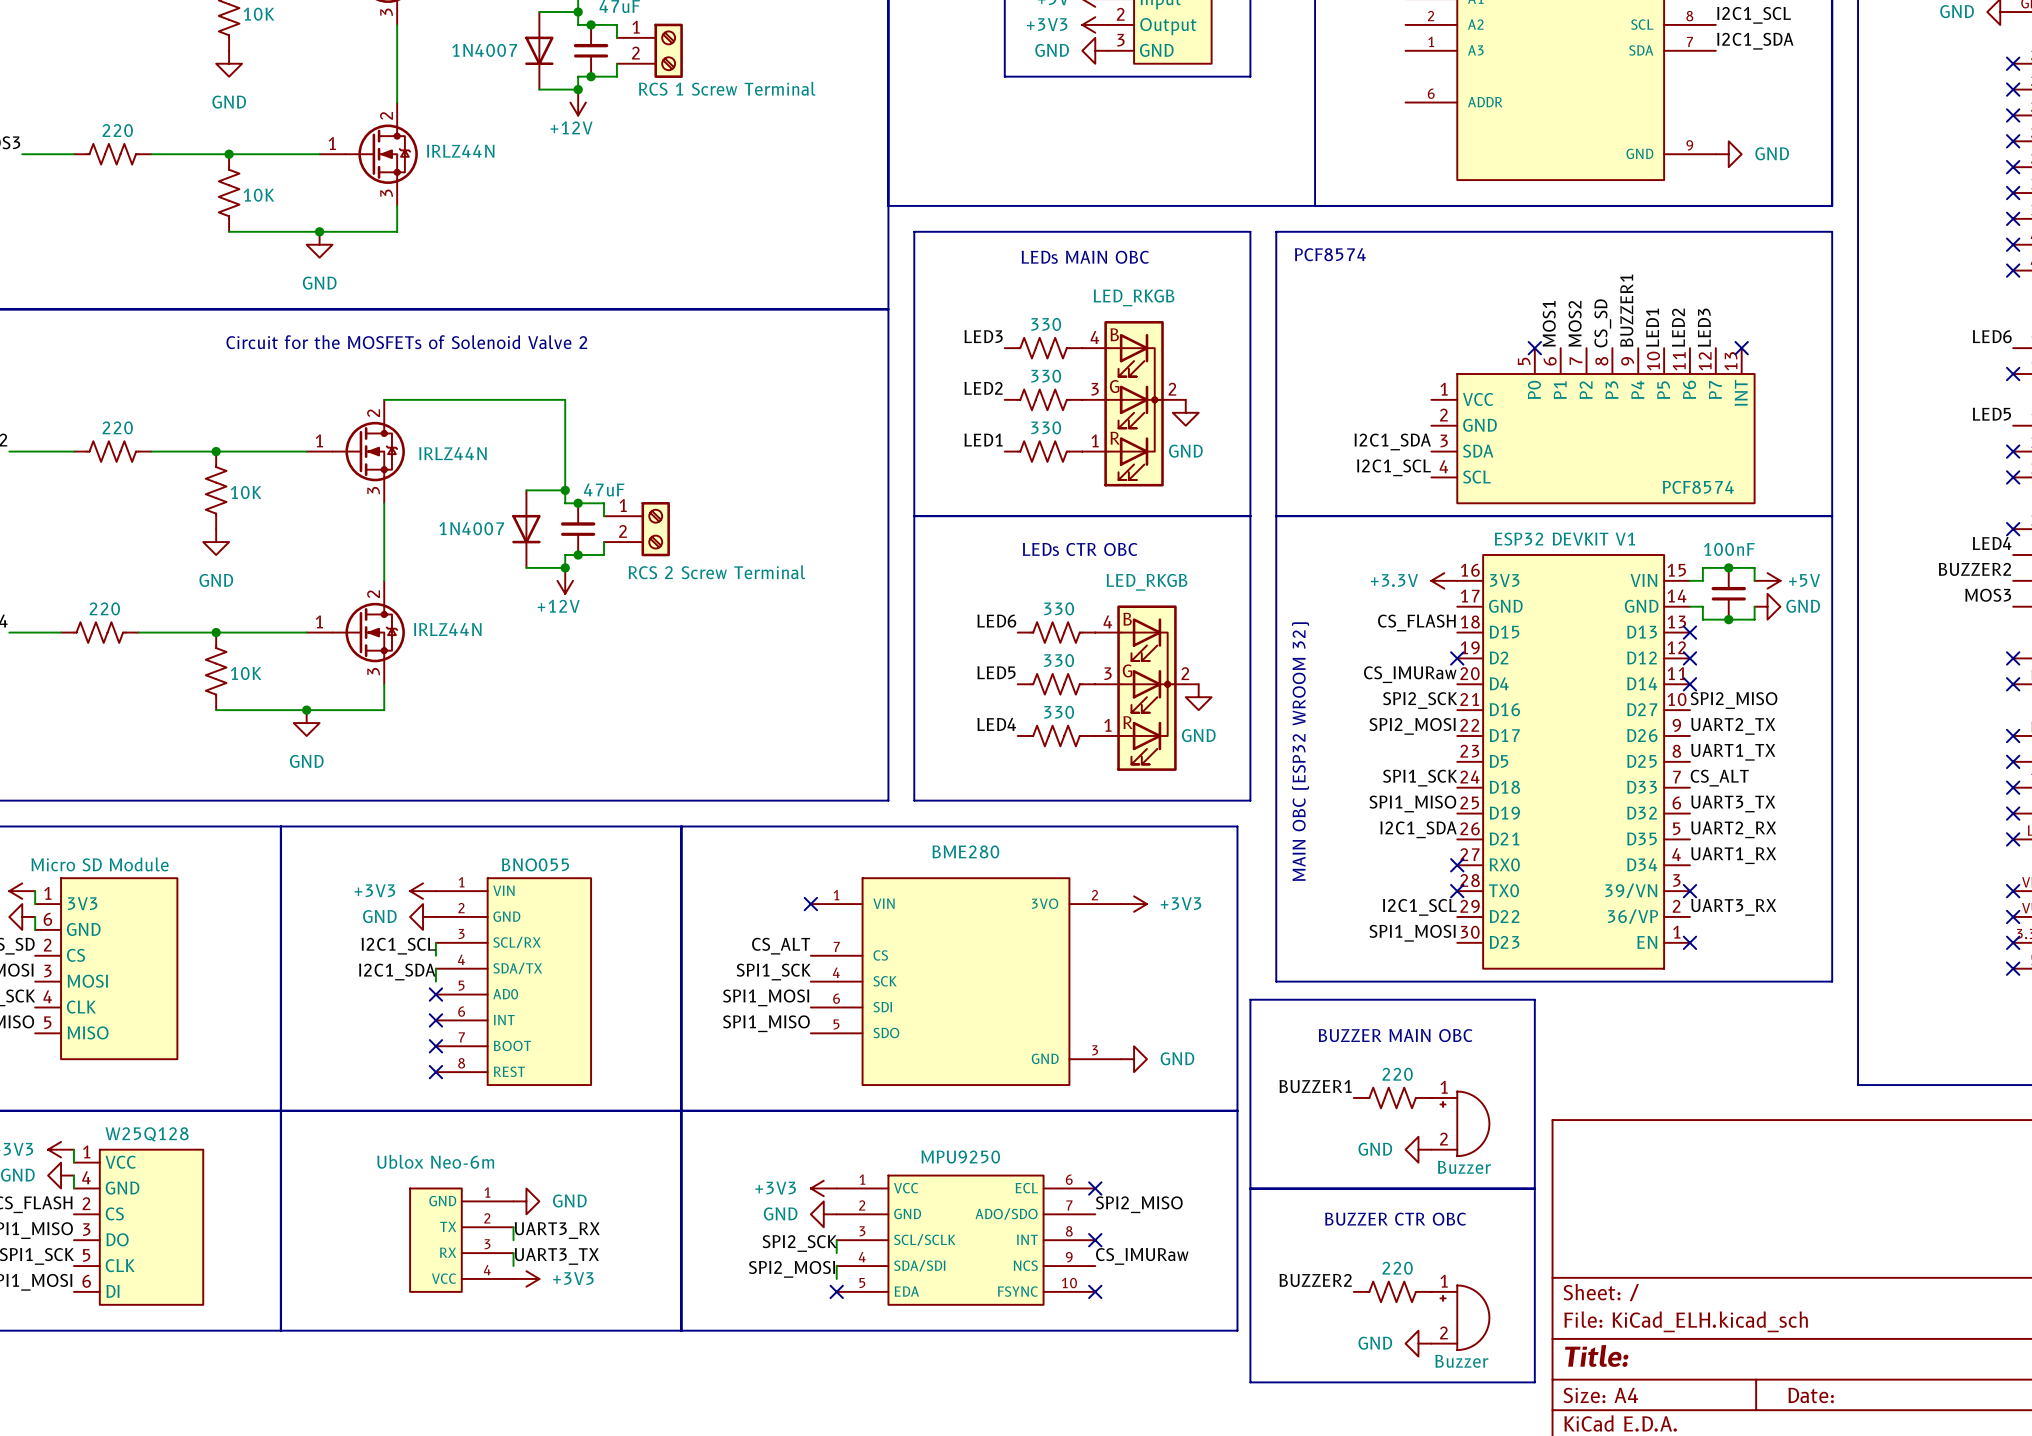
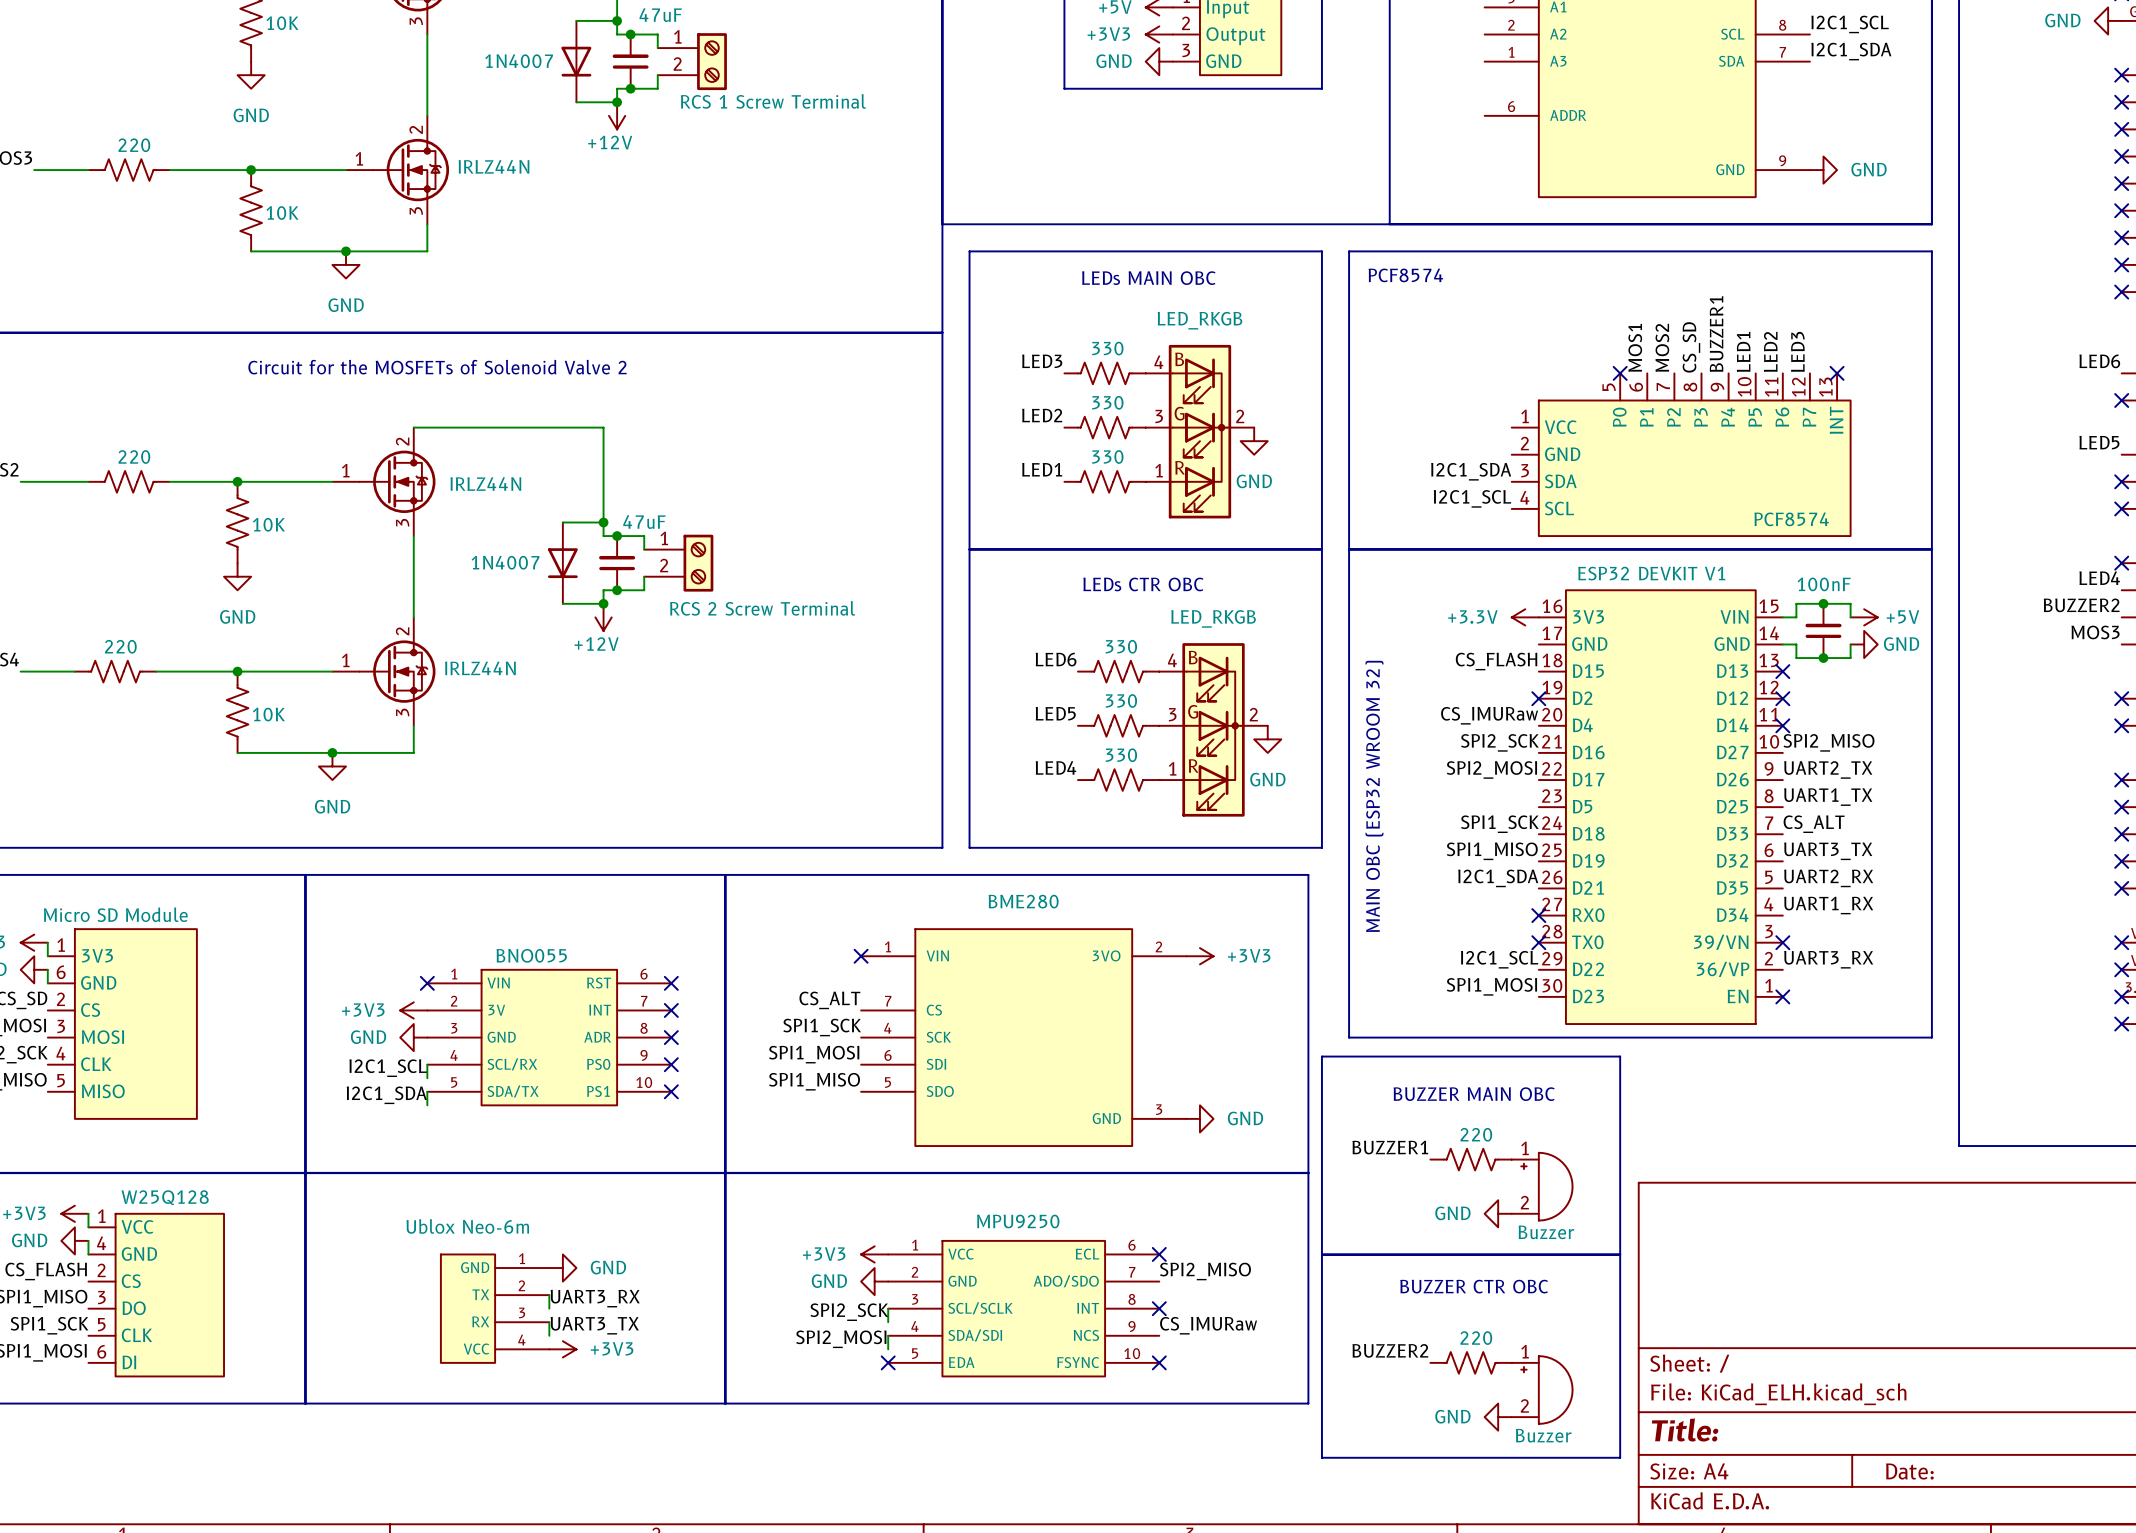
part value position: BNO055 (535, 864) -> BNO055 (531, 955)
part symbol: [435, 878, 592, 1086] -> [427, 969, 672, 1106]
power symbol position: +3V3 (423, 891) -> +3V3 (413, 1010)
power symbol position: GND (423, 916) -> GND (413, 1037)
no-connect mark: none -> (427, 983)
no-connect mark: none -> (671, 983)
wire: (435, 942) (435, 955) -> (427, 1064) (427, 1078)
label position: I2C1_SCL (398, 946) -> I2C1_SCL (388, 1068)
no-connect mark: none -> (671, 1010)
wire: (435, 968) (435, 981) -> (427, 1091) (427, 1105)
label position: I2C1_SDA (397, 972) -> I2C1_SDA (386, 1095)
no-connect mark: none -> (671, 1037)
no-connect mark: (435, 994) -> none
no-connect mark: none -> (671, 1064)
no-connect mark: (435, 1020) -> none
no-connect mark: none -> (671, 1091)
no-connect mark: (435, 1046) -> none
no-connect mark: (435, 1072) -> none

